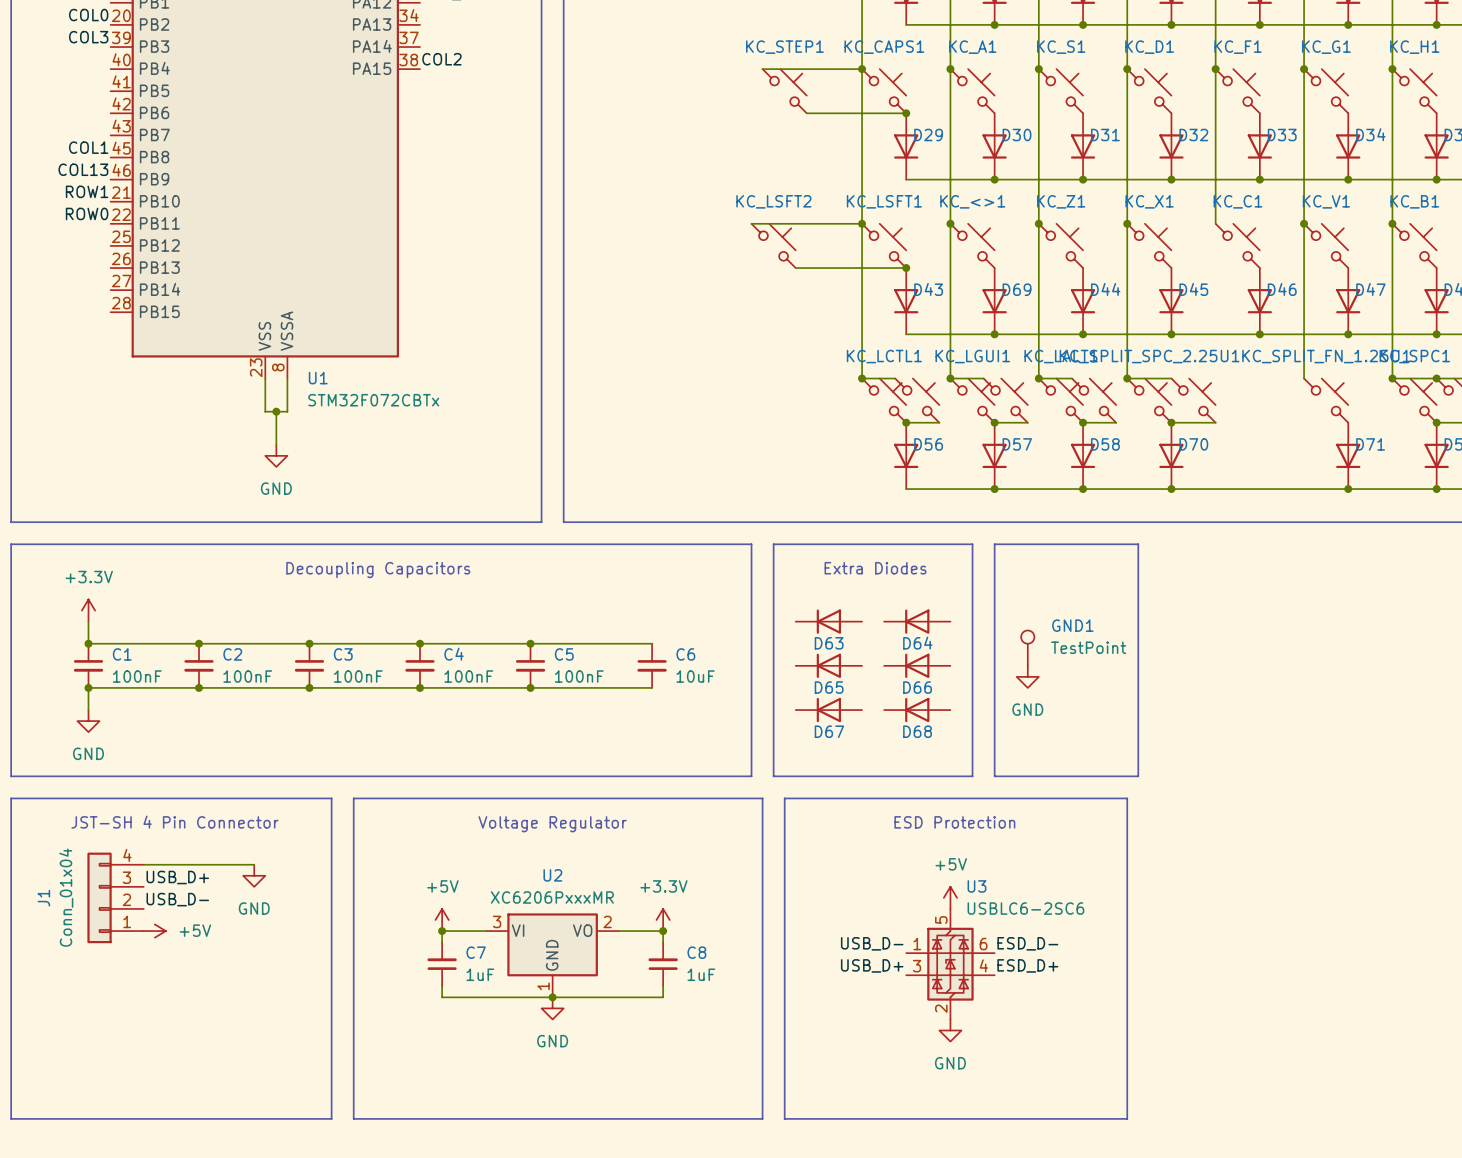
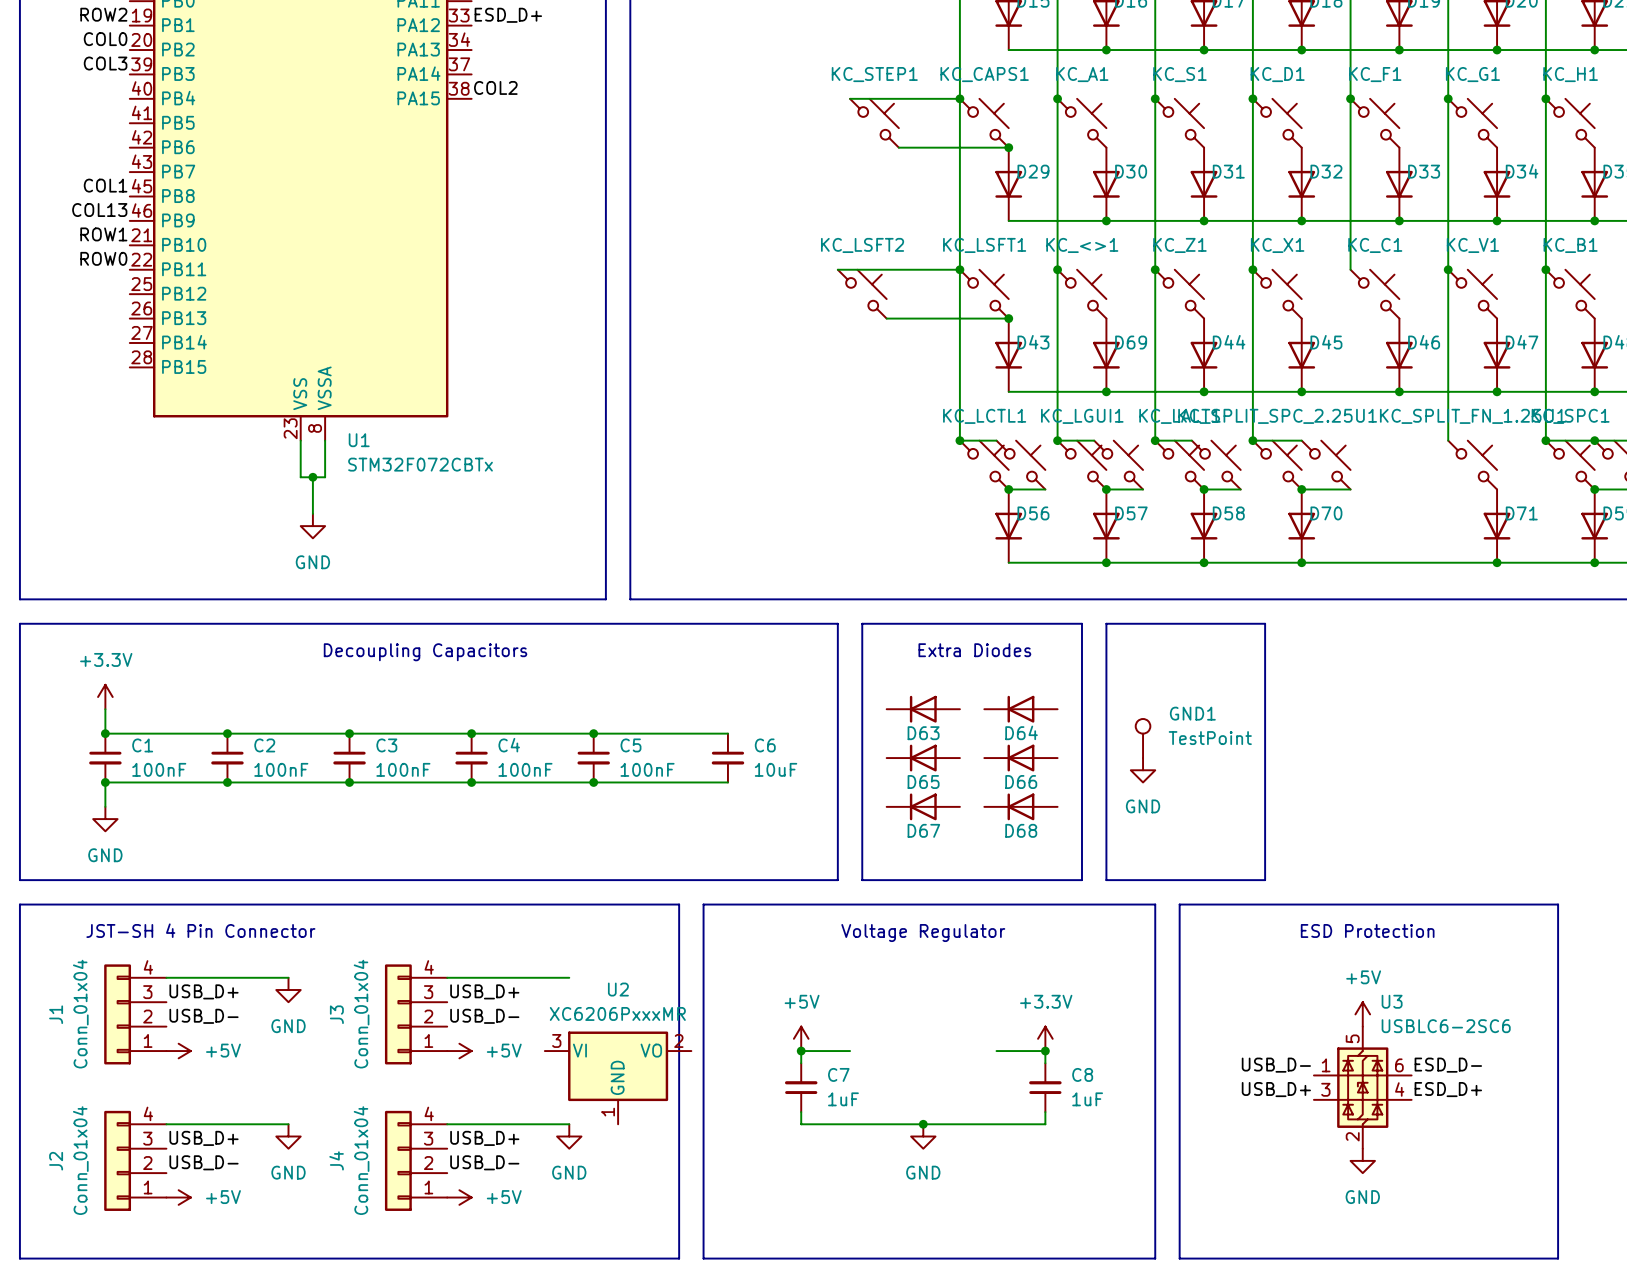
line: (331, 798) (331, 1118) -> (373, 904) (398, 904)
line: (353, 798) (353, 1118) -> (373, 1258) (398, 1258)
line: (607, 798) (629, 798) -> (679, 904) (679, 1258)
line: (762, 798) (762, 1118) -> (850, 904) (874, 904)
line: (784, 798) (784, 1118) -> (850, 1258) (874, 1258)
line: (1038, 798) (1060, 798) -> (1155, 904) (1155, 1258)
line: (1127, 798) (1127, 1118) -> (1252, 904) (1558, 904) (1558, 1258) (1252, 1258)
text: ESD Protection (954, 822) -> none
text: none -> ESD Protection (1367, 930)
text: Voltage Regulator (552, 824) -> none
text: none -> Voltage Regulator (923, 933)
wire: none -> (447, 977) (569, 977)
label: none -> USB_D+ (484, 991)
J3: none -> Conn_01x04 (416, 1014)
power symbol: +5V (950, 897) -> none
power symbol: none -> +5V (1362, 1014)
label: none -> USB_D- (484, 1016)
power symbol rotation: 0° (442, 920) -> 90° clockwise (459, 1051)
power symbol position: +5V (442, 920) -> +5V (459, 1051)
power symbol: +3.3V (663, 920) -> none
power symbol: none -> +5V (801, 1038)
power symbol: none -> +3.3V (1045, 1038)
junction: (442, 931) -> none
wire: (486, 931) (442, 931) (442, 942) -> none
wire: (618, 931) (663, 931) (663, 942) -> none
junction: (663, 931) -> none
junction: none -> (801, 1051)
wire: none -> (850, 1051) (801, 1051) (801, 1063)
wire: none -> (996, 1051) (1045, 1051) (1045, 1063)
junction: none -> (1045, 1051)
label: USB_D- (872, 943) -> none
label: ESD_D- (1027, 943) -> none
label: none -> USB_D- (1276, 1065)
label: none -> ESD_D- (1448, 1065)
C7 position: (442, 964) -> (801, 1087)
C8 position: (663, 964) -> (1045, 1087)
U3 position: (950, 964) -> (1362, 1087)
label: USB_D+ (872, 965) -> none
label: ESD_D+ (1027, 965) -> none
label: none -> USB_D+ (1276, 1089)
label: none -> ESD_D+ (1448, 1089)
wire: (442, 986) (442, 997) -> (447, 1124) (496, 1124)
wire: (663, 986) (663, 997) (508, 997) -> none
wire: none -> (801, 1112) (801, 1124) (1045, 1124) (1045, 1112)
wire: none -> (166, 1124) (288, 1124)
junction: (552, 997) -> none
junction: none -> (923, 1124)
power symbol: none -> GND (288, 1136)
power symbol position: GND (552, 1008) -> GND (569, 1136)
label: none -> USB_D+ (204, 1138)
label: none -> USB_D+ (484, 1138)
J2: none -> Conn_01x04 (135, 1160)
J4: none -> Conn_01x04 (416, 1160)
power symbol position: GND (950, 1030) -> GND (923, 1136)
power symbol: none -> GND (1362, 1160)
label: none -> USB_D- (204, 1162)
label: none -> USB_D- (484, 1162)
power symbol: none -> +5V (178, 1197)
power symbol: none -> +5V (459, 1197)
line: (607, 1118) (629, 1118) -> (703, 904) (703, 1258)
line: (1038, 1118) (1060, 1118) -> (1179, 904) (1179, 1258)

